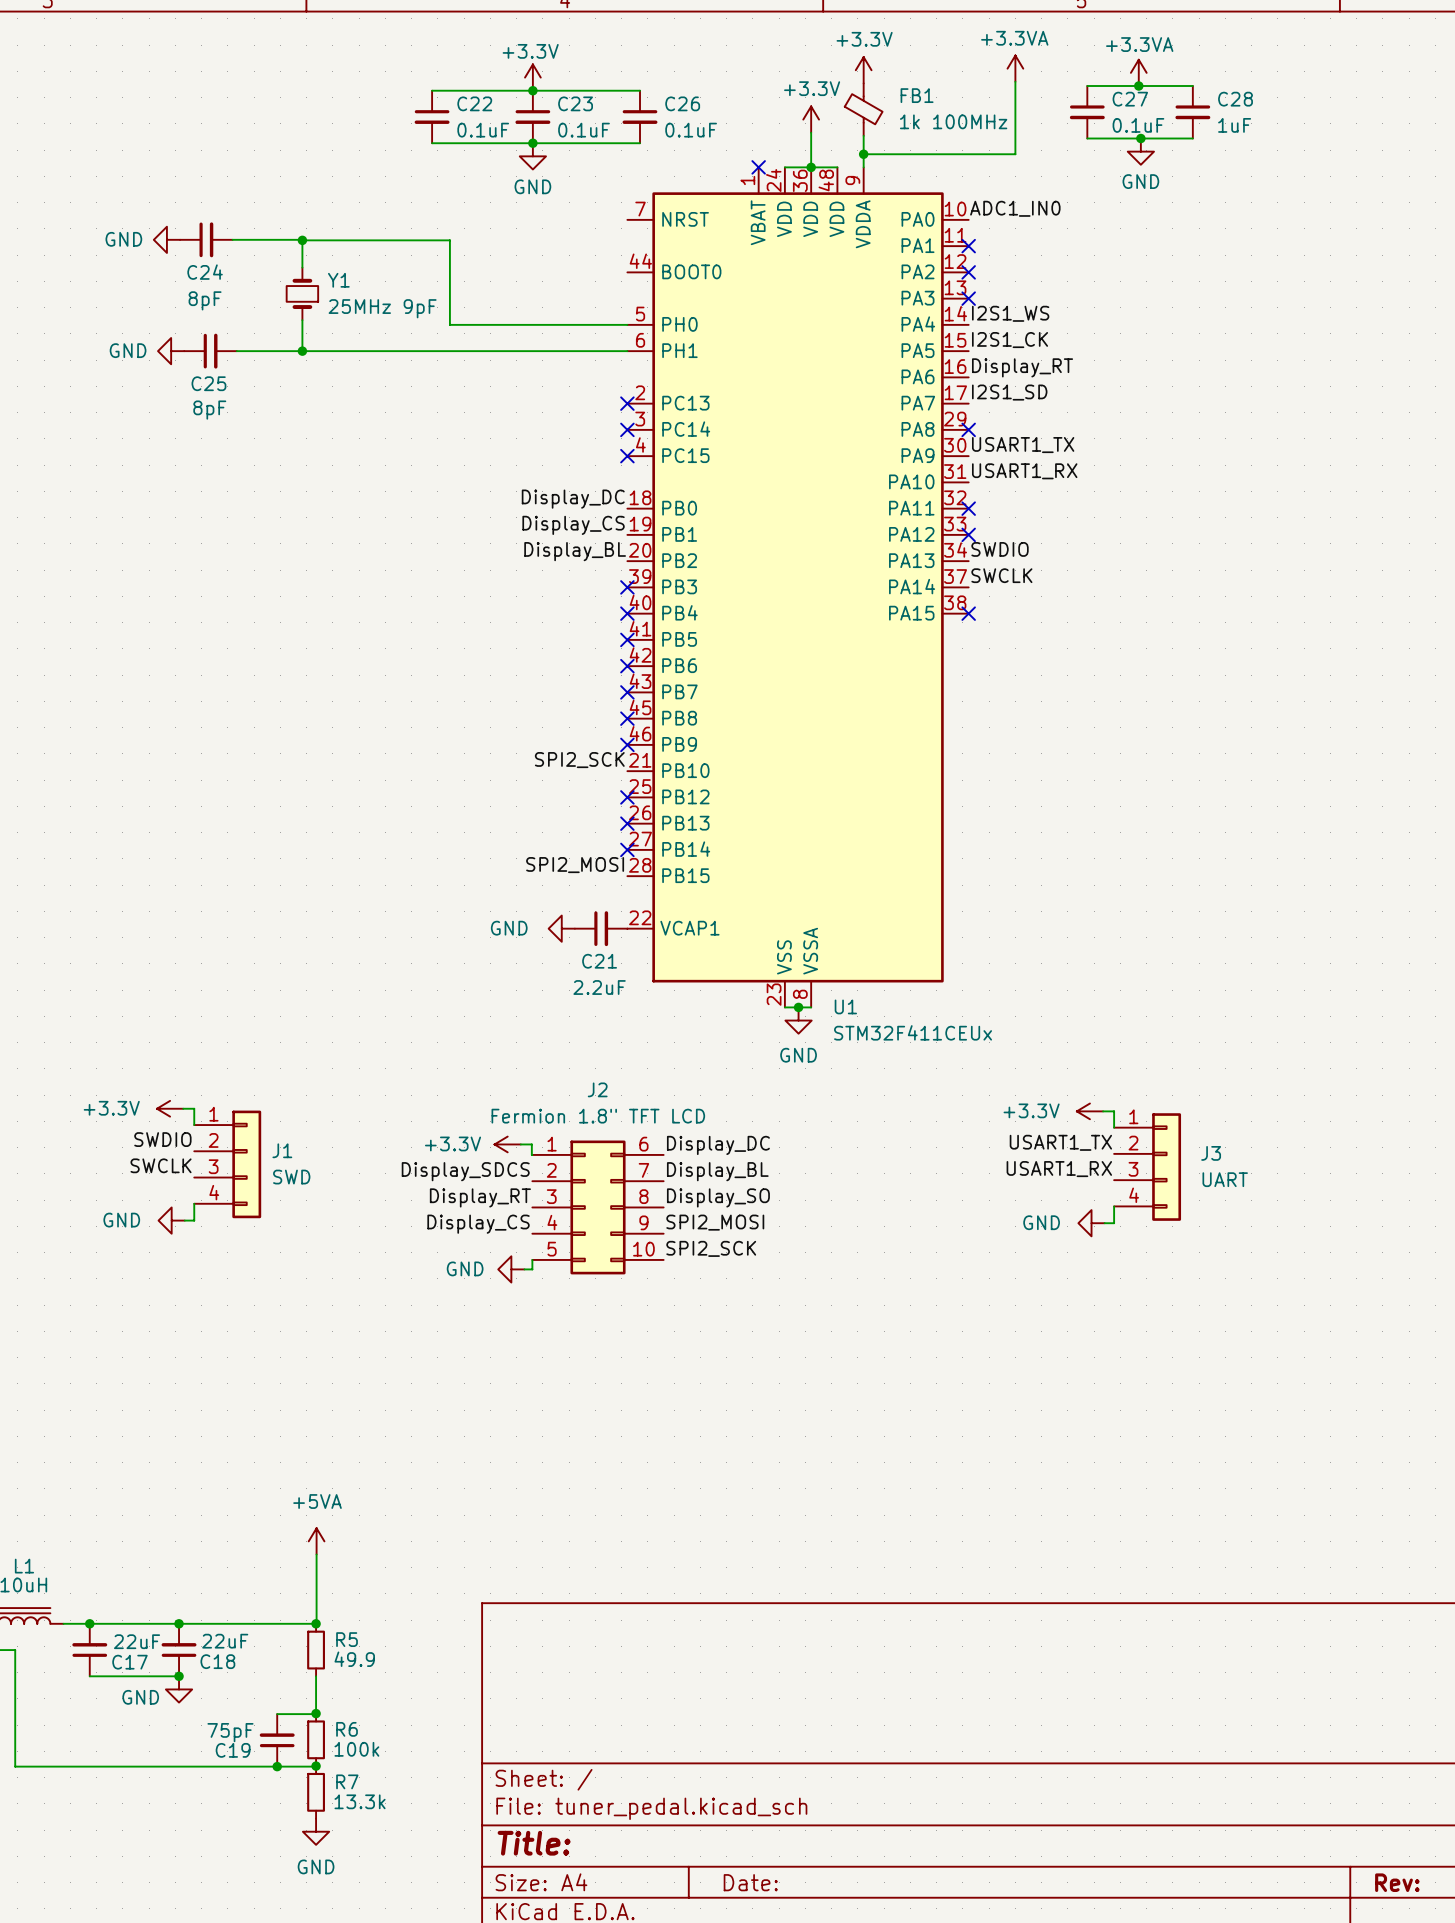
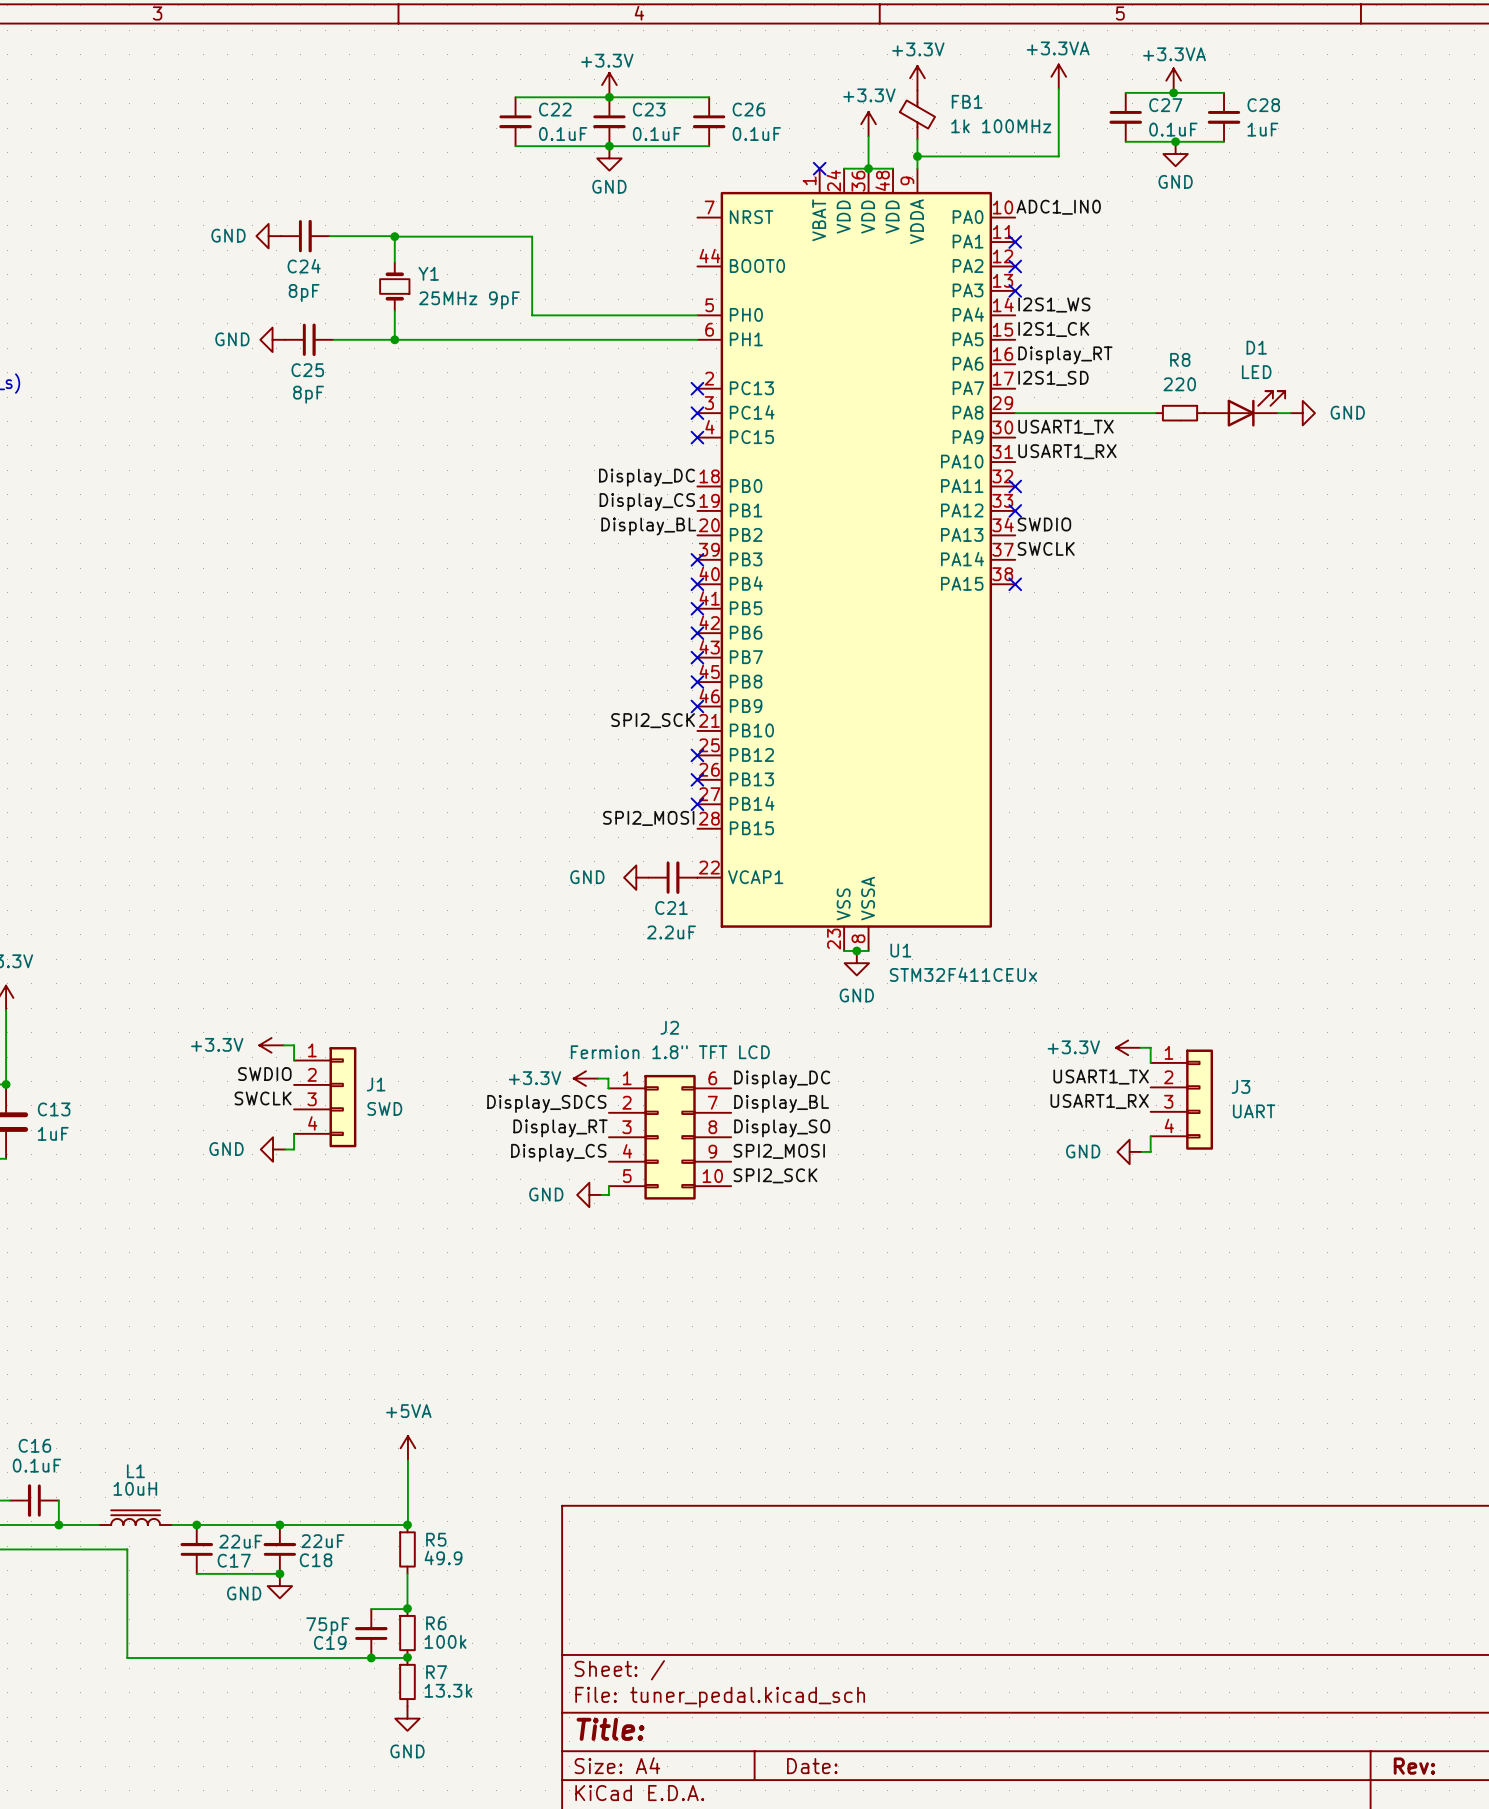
D1: none -> LED (1244, 408)
wire: none -> (1015, 413) (1155, 413)
no-connect mark: (968, 429) -> none
R8: none -> 220 (1180, 413)
wire: none -> (1277, 413) (1290, 413)
power symbol: none -> GND (1302, 413)

